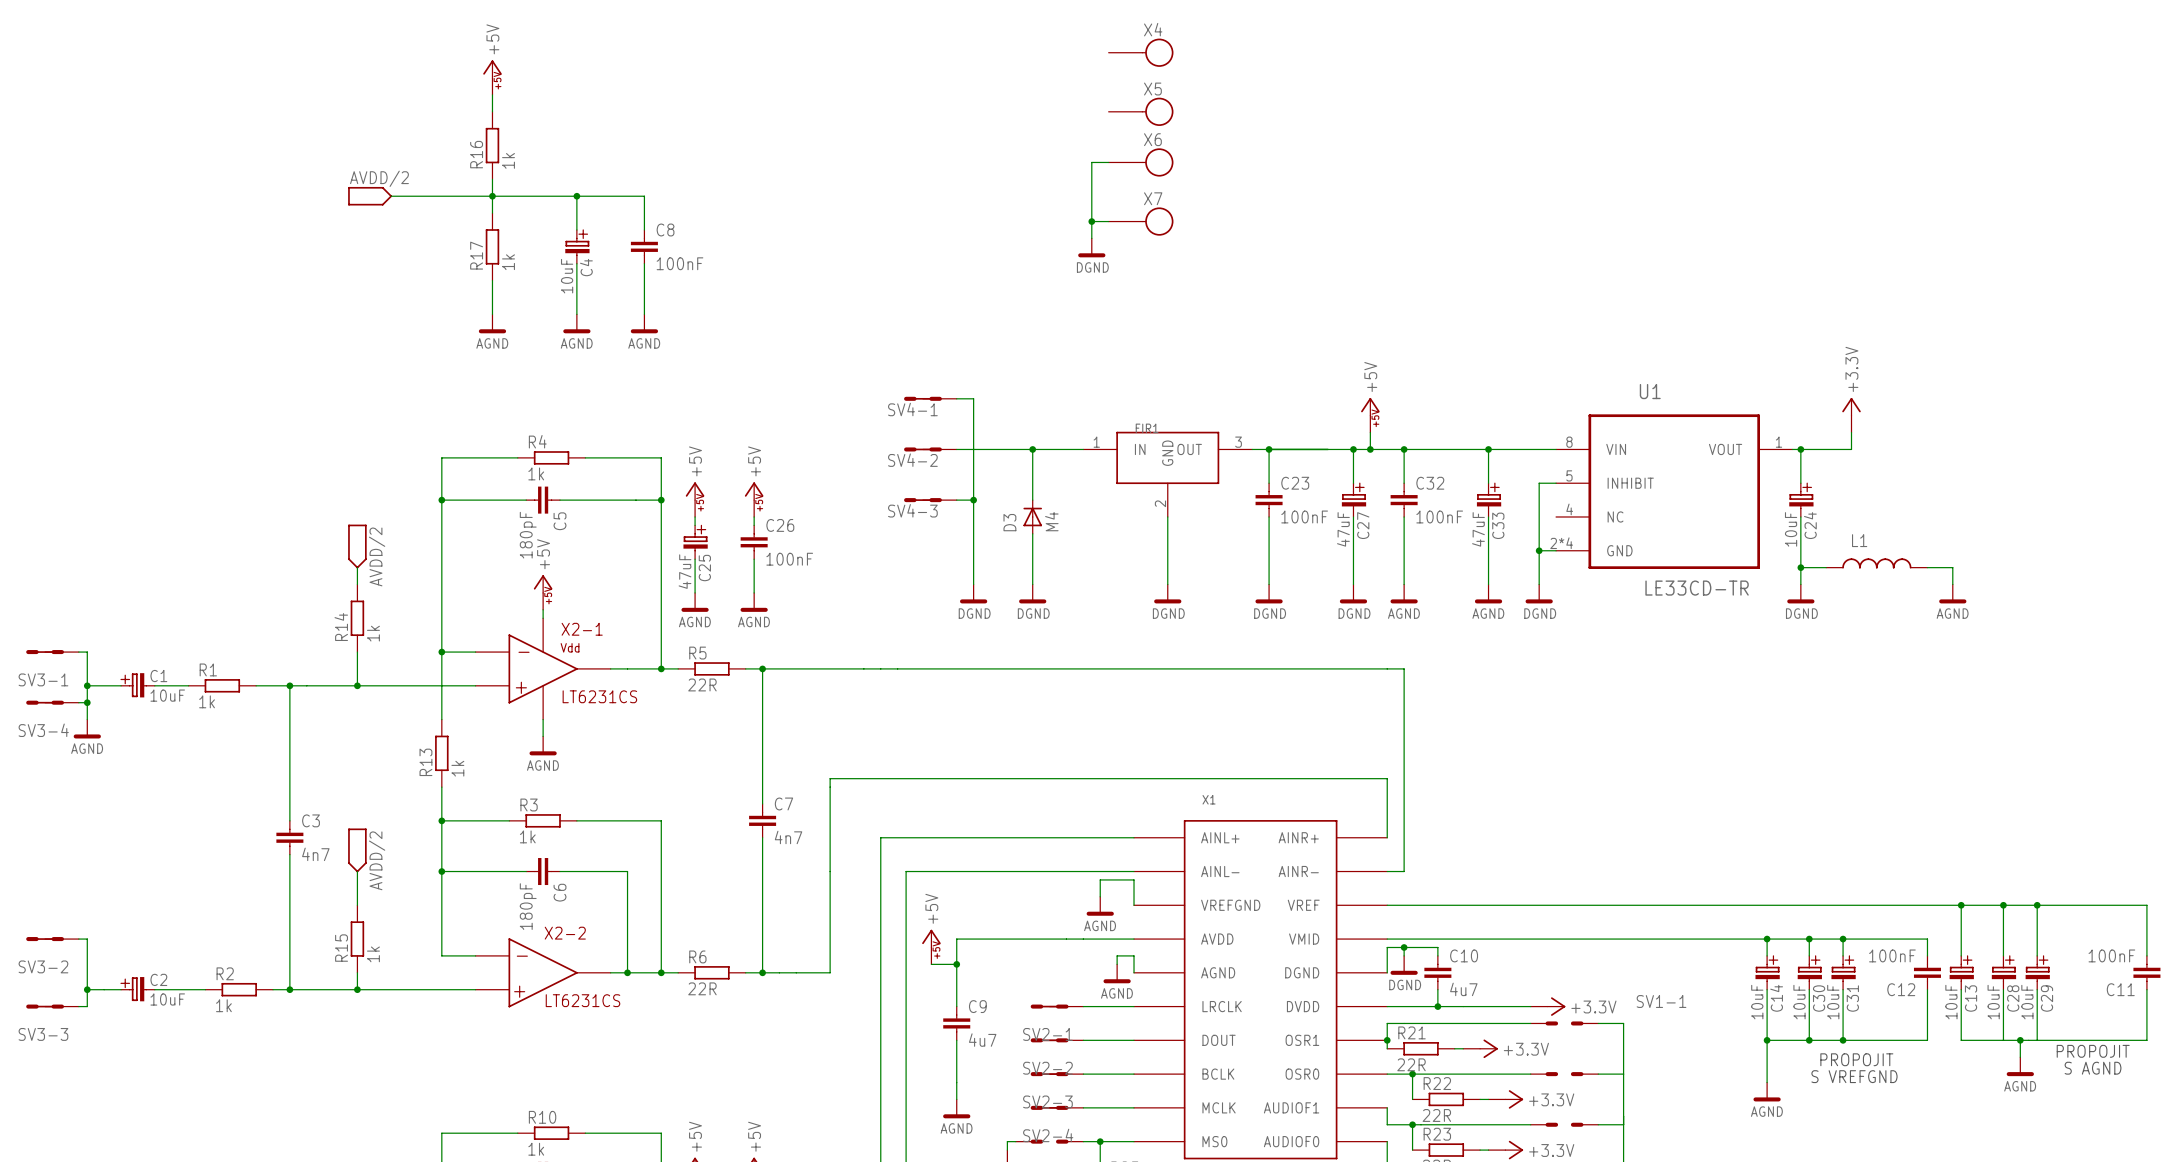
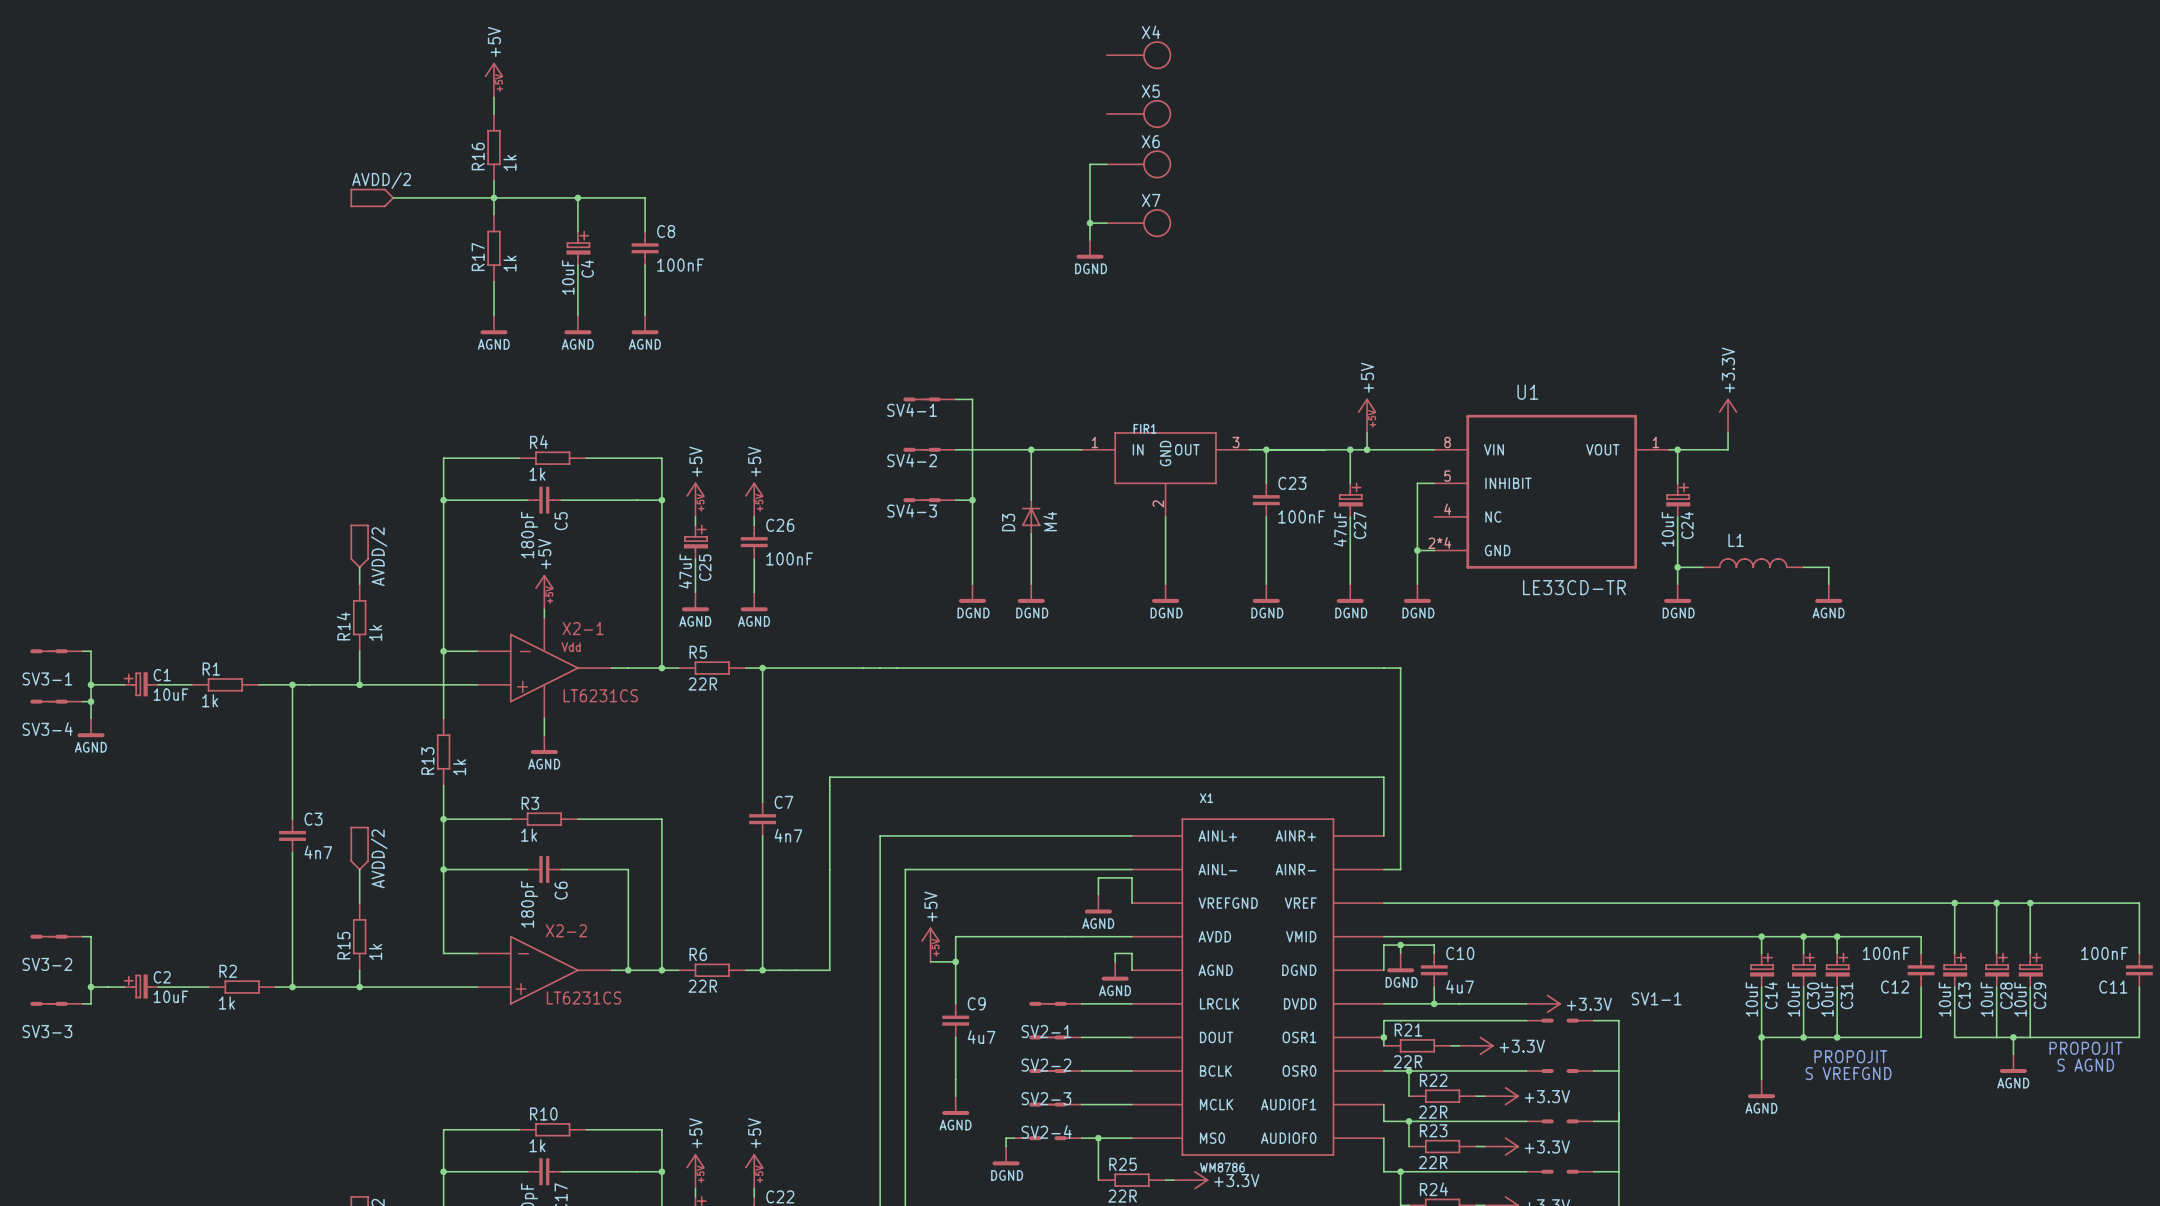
power symbol position: +3.3V (1851, 415) -> +3.3V (1728, 415)
wire: (1851, 432) (1851, 449) (1792, 449) -> (1728, 433) (1728, 449) (1669, 449)
wire: (1404, 449) (1404, 483) -> none
junction: (1404, 449) -> none
wire: (1437, 449) (1556, 449) -> none
wire: (1488, 449) (1488, 483) -> none
junction: (1488, 449) -> none
junction: none -> (1677, 449)
wire: (1800, 449) (1800, 483) -> (1677, 449) (1677, 483)
junction: (1800, 449) -> none
wire: (1556, 483) (1539, 483) (1539, 584) -> (1434, 483) (1417, 483) (1417, 584)
U1 position: (1674, 491) -> (1551, 491)
C32: 100nF (1404, 500) -> none
C33: 47uF (1489, 500) -> none
C24 position: (1801, 500) -> (1678, 500)
wire: (1404, 516) (1404, 584) -> none
wire: (1488, 516) (1488, 584) -> none
wire: (1800, 516) (1800, 584) -> (1677, 516) (1677, 584)
junction: none -> (1417, 550)
wire: (1539, 550) (1556, 550) -> (1417, 550) (1434, 550)
junction: (1539, 550) -> none
L1 position: (1876, 563) -> (1753, 563)
junction: none -> (1677, 567)
junction: (1800, 567) -> none
wire: none -> (1820, 567) (1828, 567) (1828, 584)
wire: (1927, 567) (1952, 567) (1952, 584) -> none
power symbol: (1404, 593) -> none
power symbol: none -> (1417, 593)
power symbol: (1488, 593) -> none
power symbol: (1539, 593) -> none
power symbol: none -> (1677, 593)
power symbol: (1800, 593) -> none
power symbol position: (1952, 593) -> (1828, 593)

